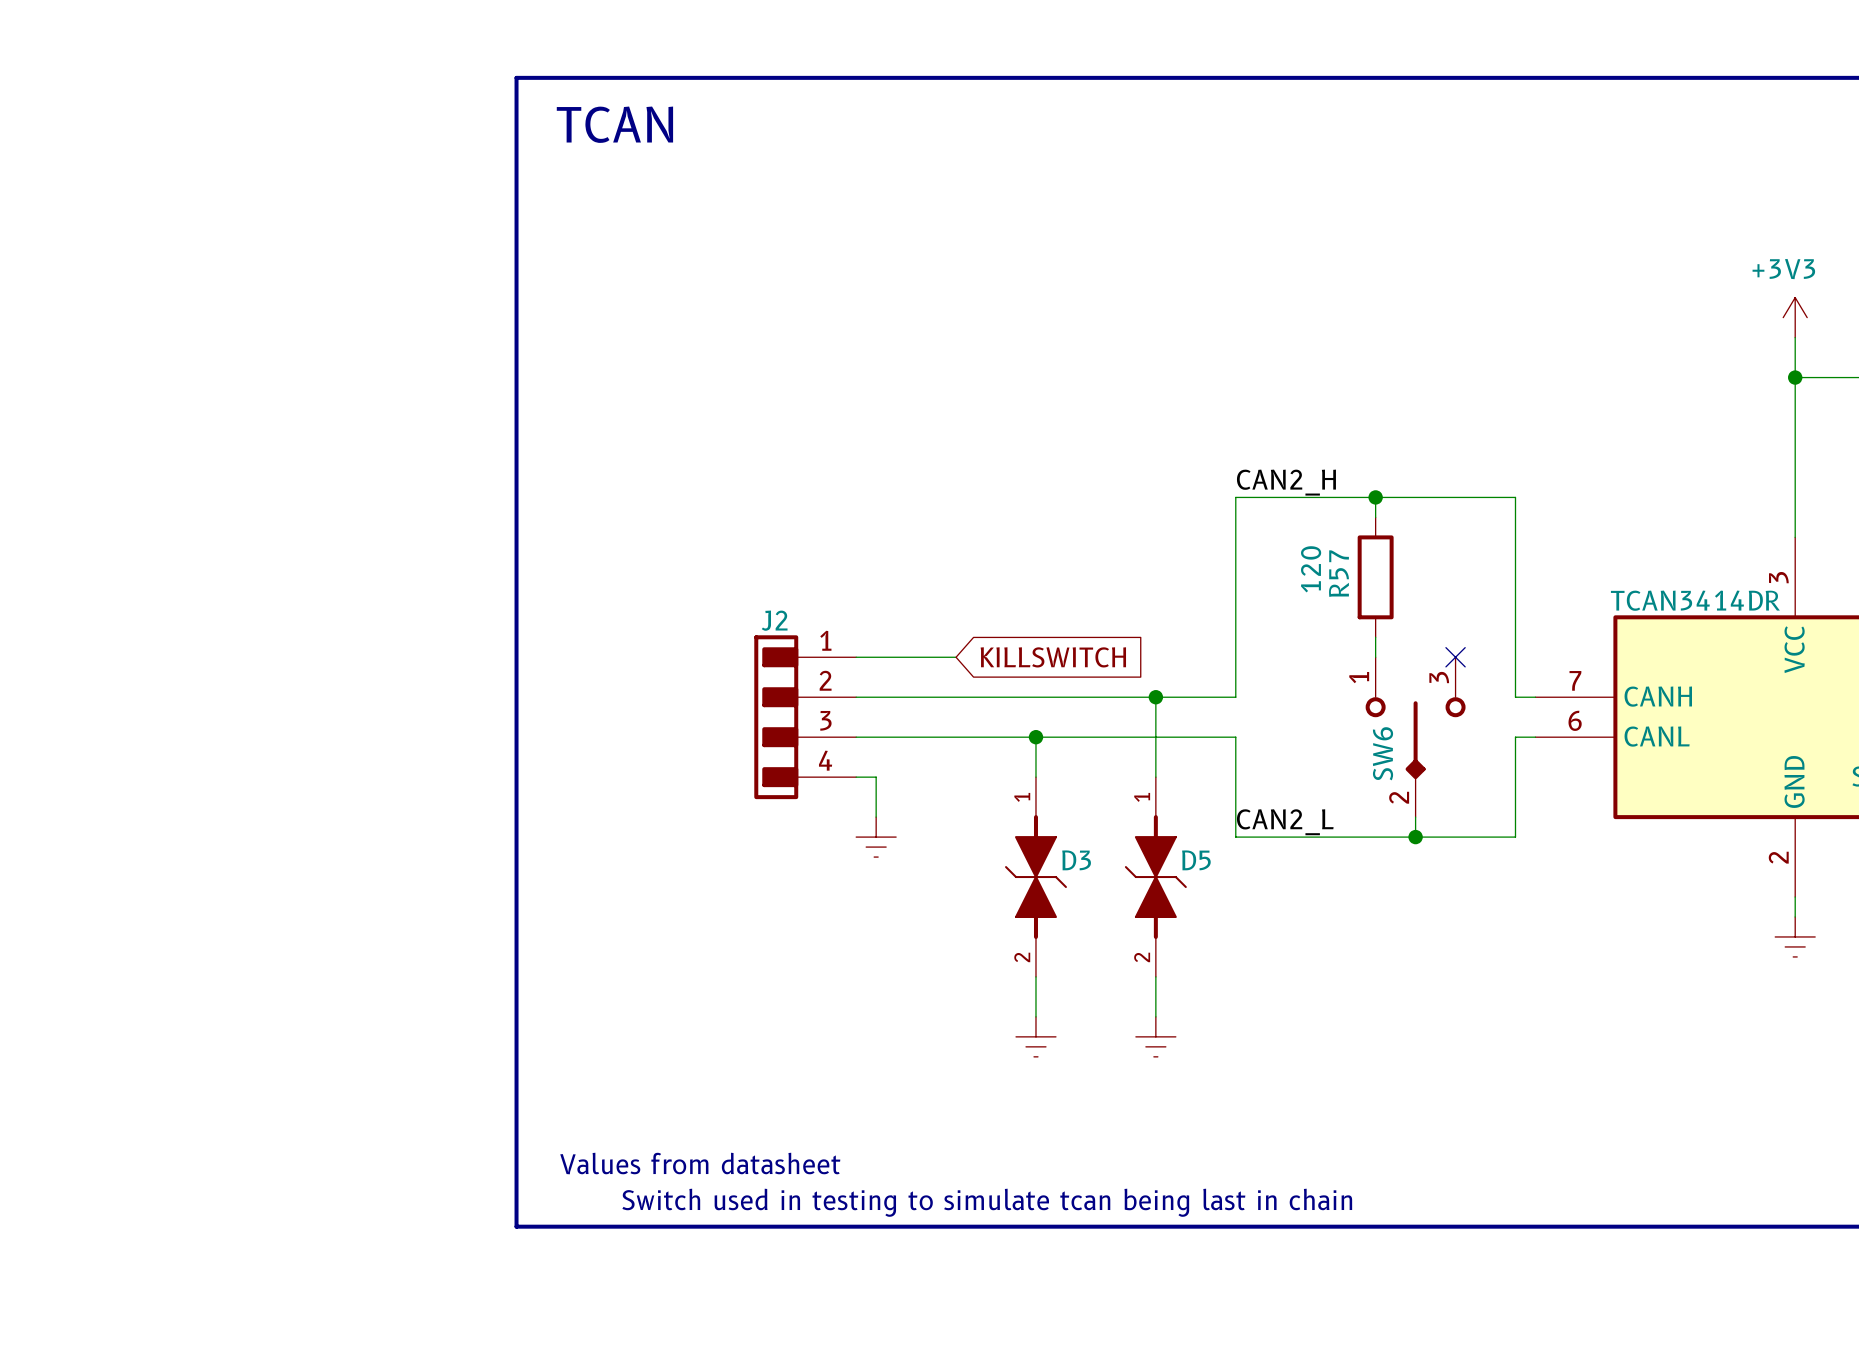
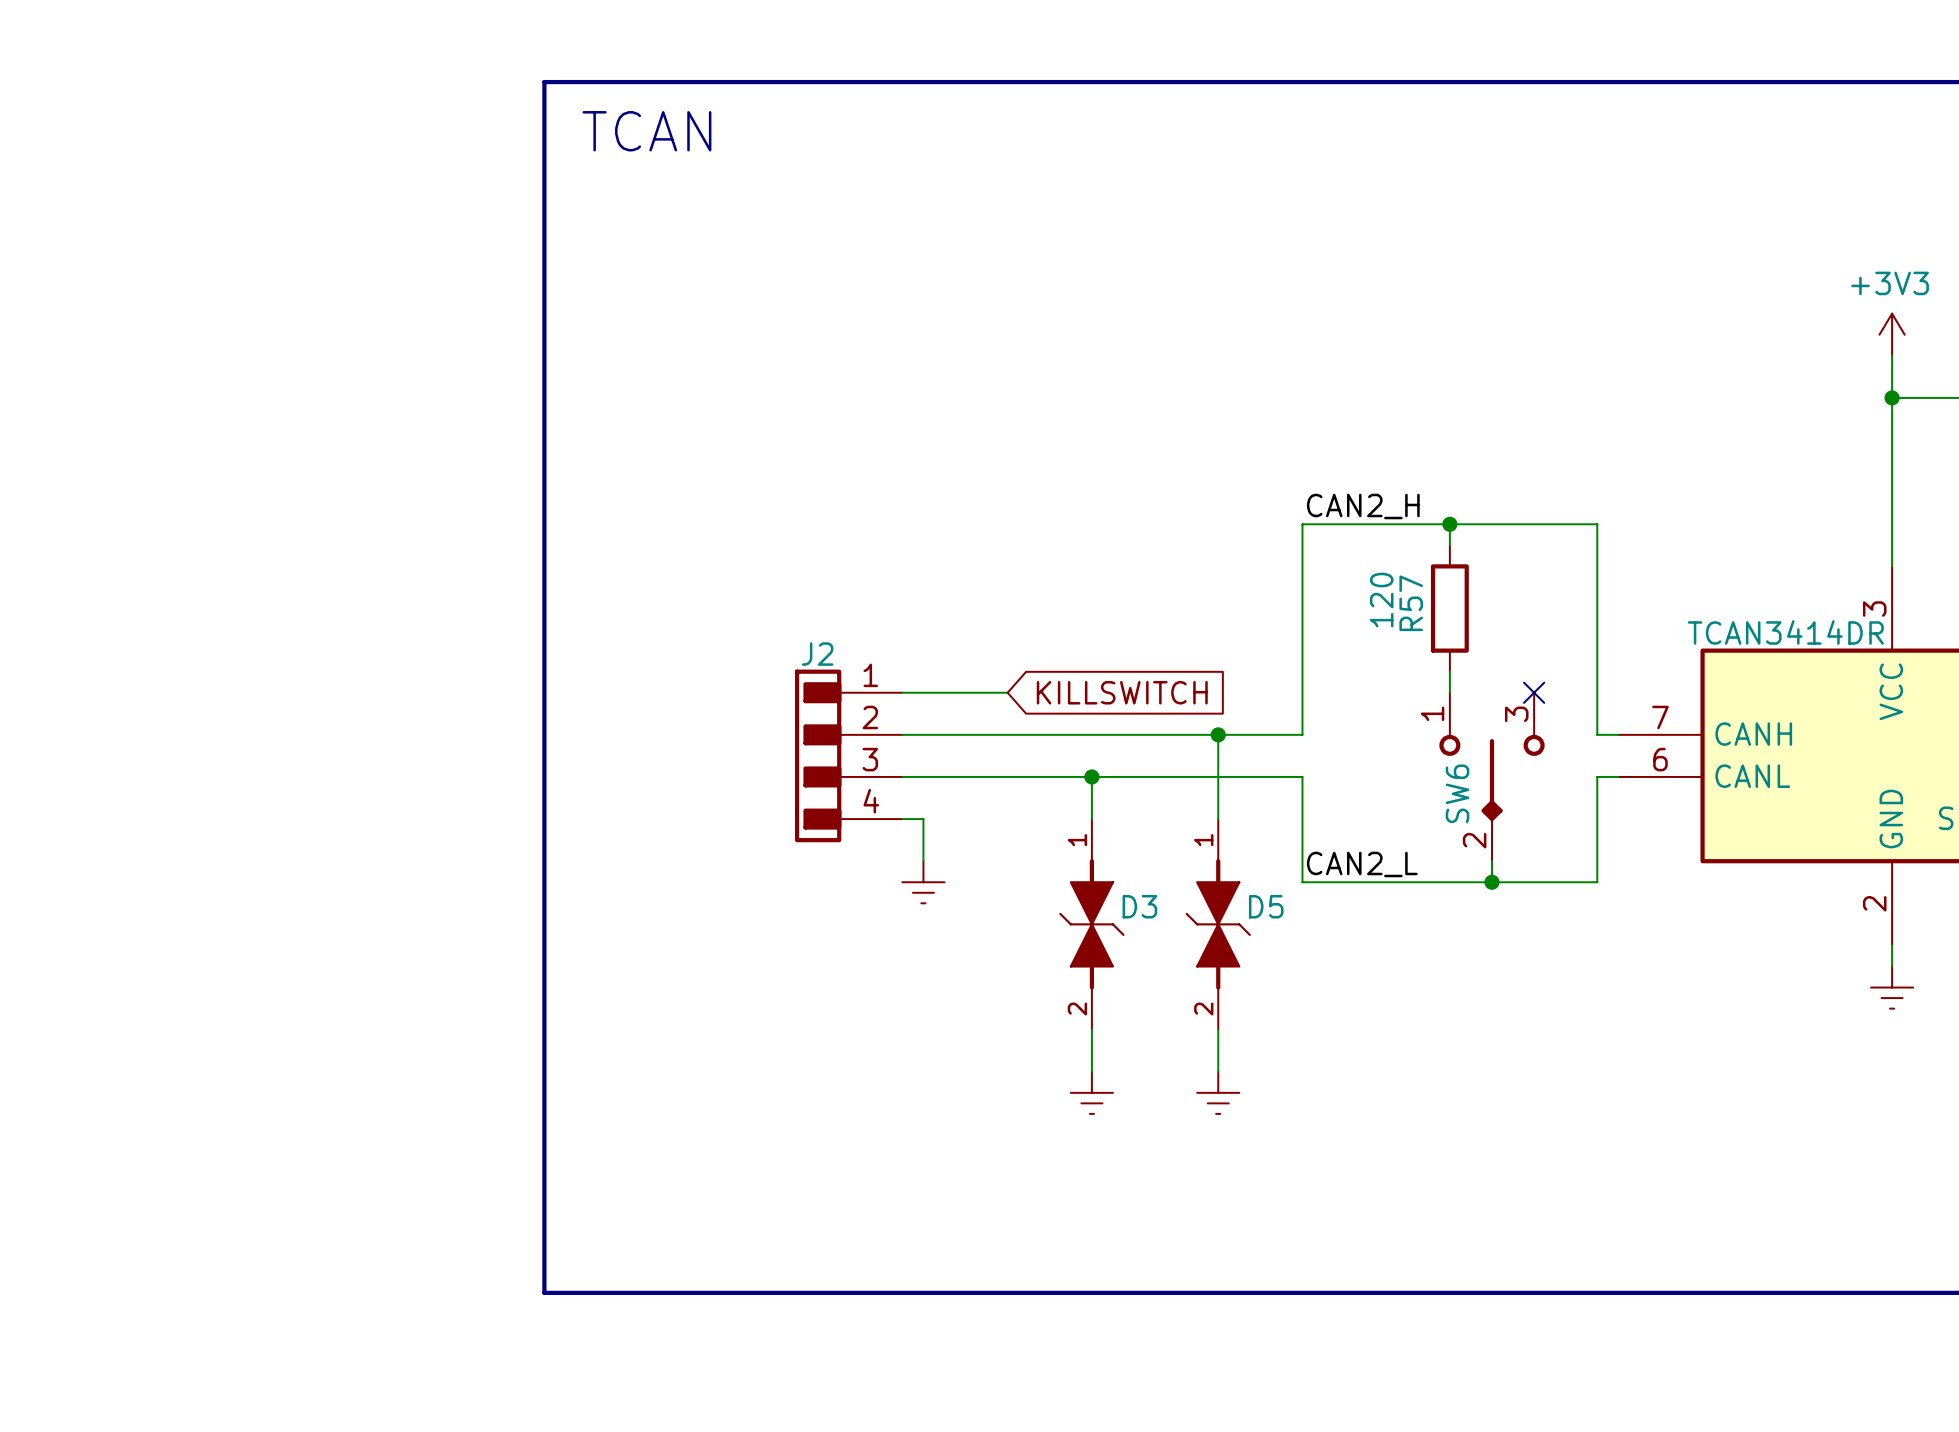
text: Values from datasheet (700, 1163) -> none
text: Switch used in testing to simulate tcan being last in chain (987, 1202) -> none

